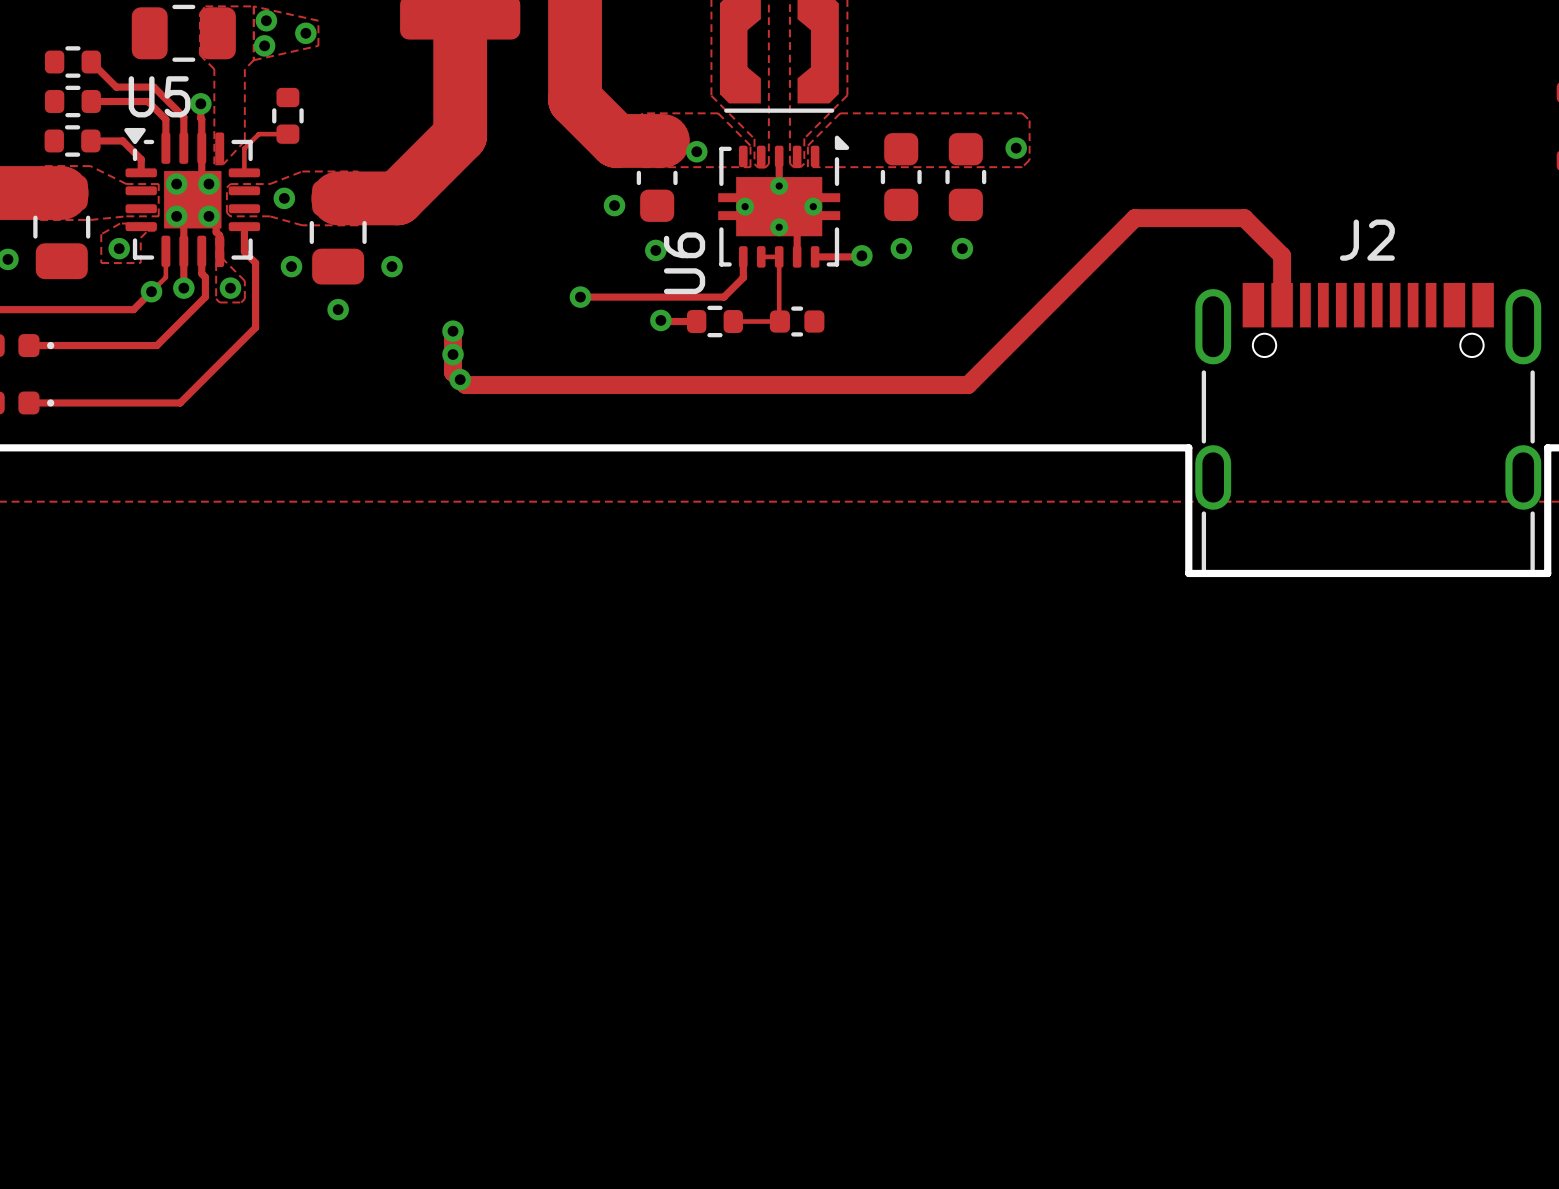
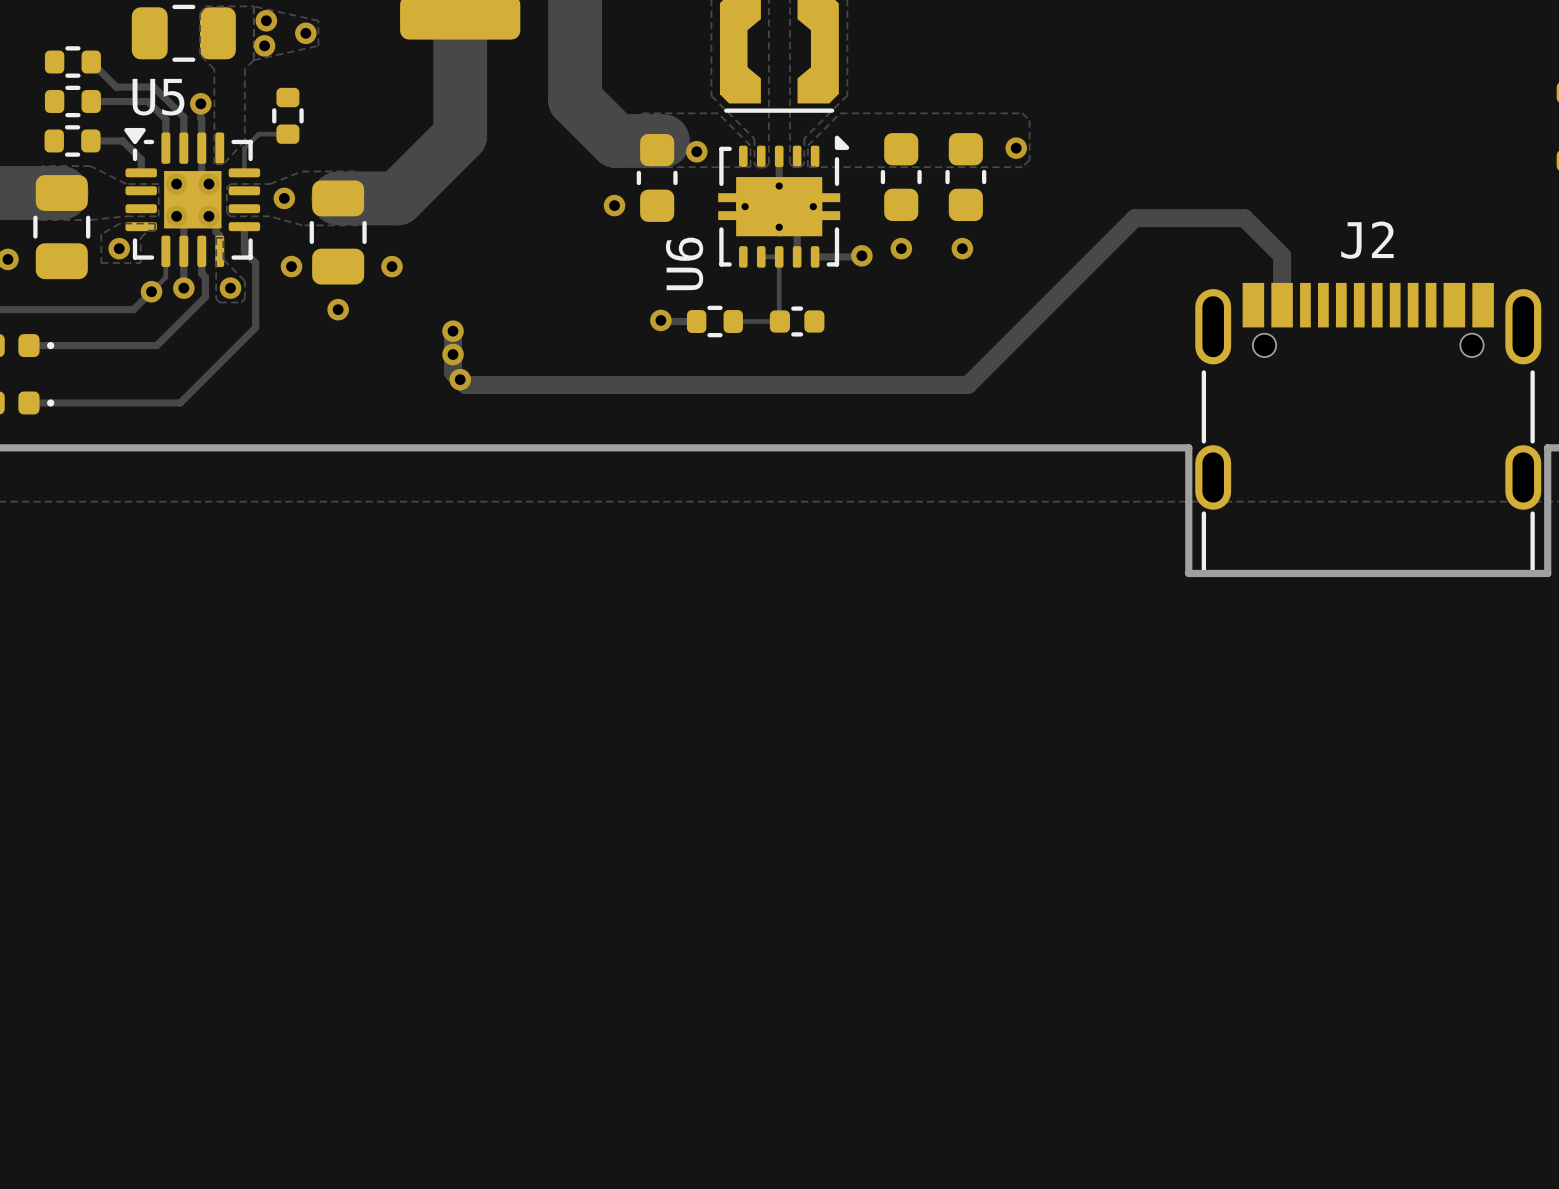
via: (655, 250) -> none
track: (743, 256) (743, 277) (723, 297) (580, 297) -> none
via: (580, 297) -> none

